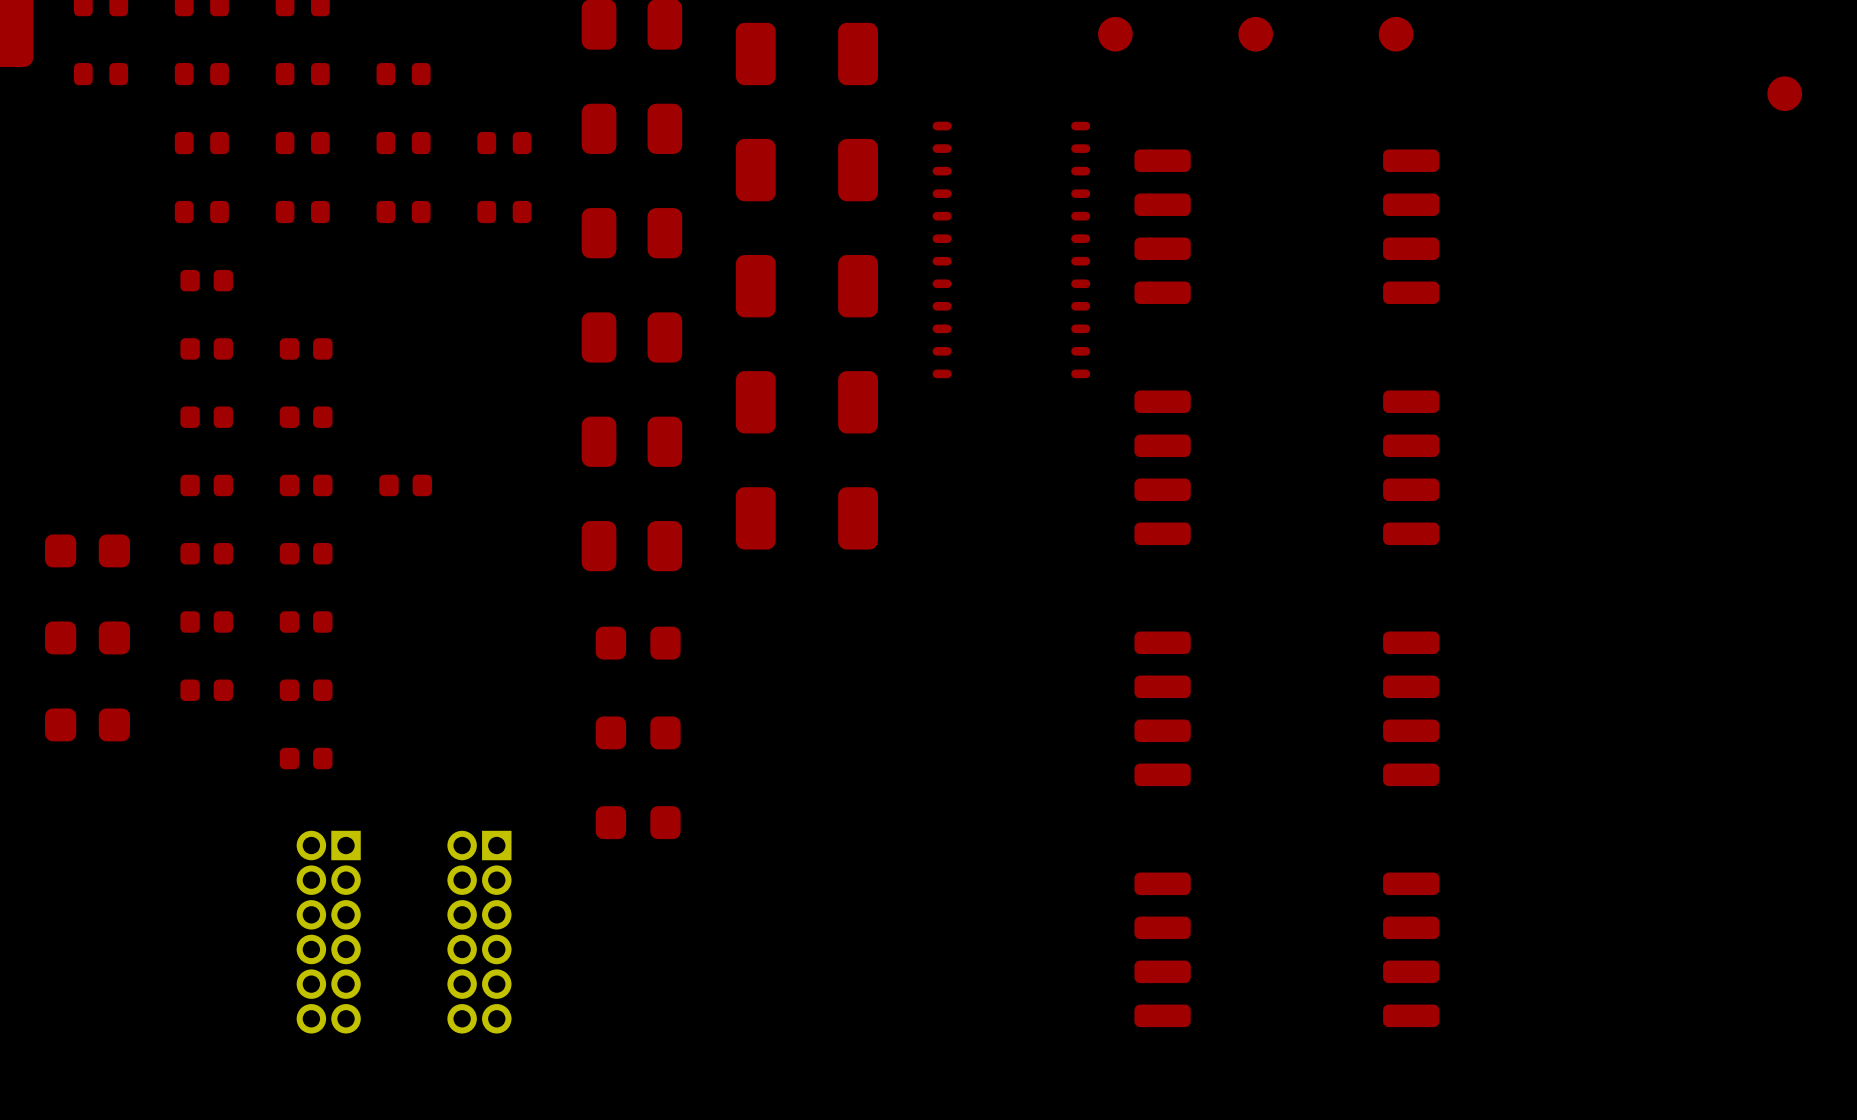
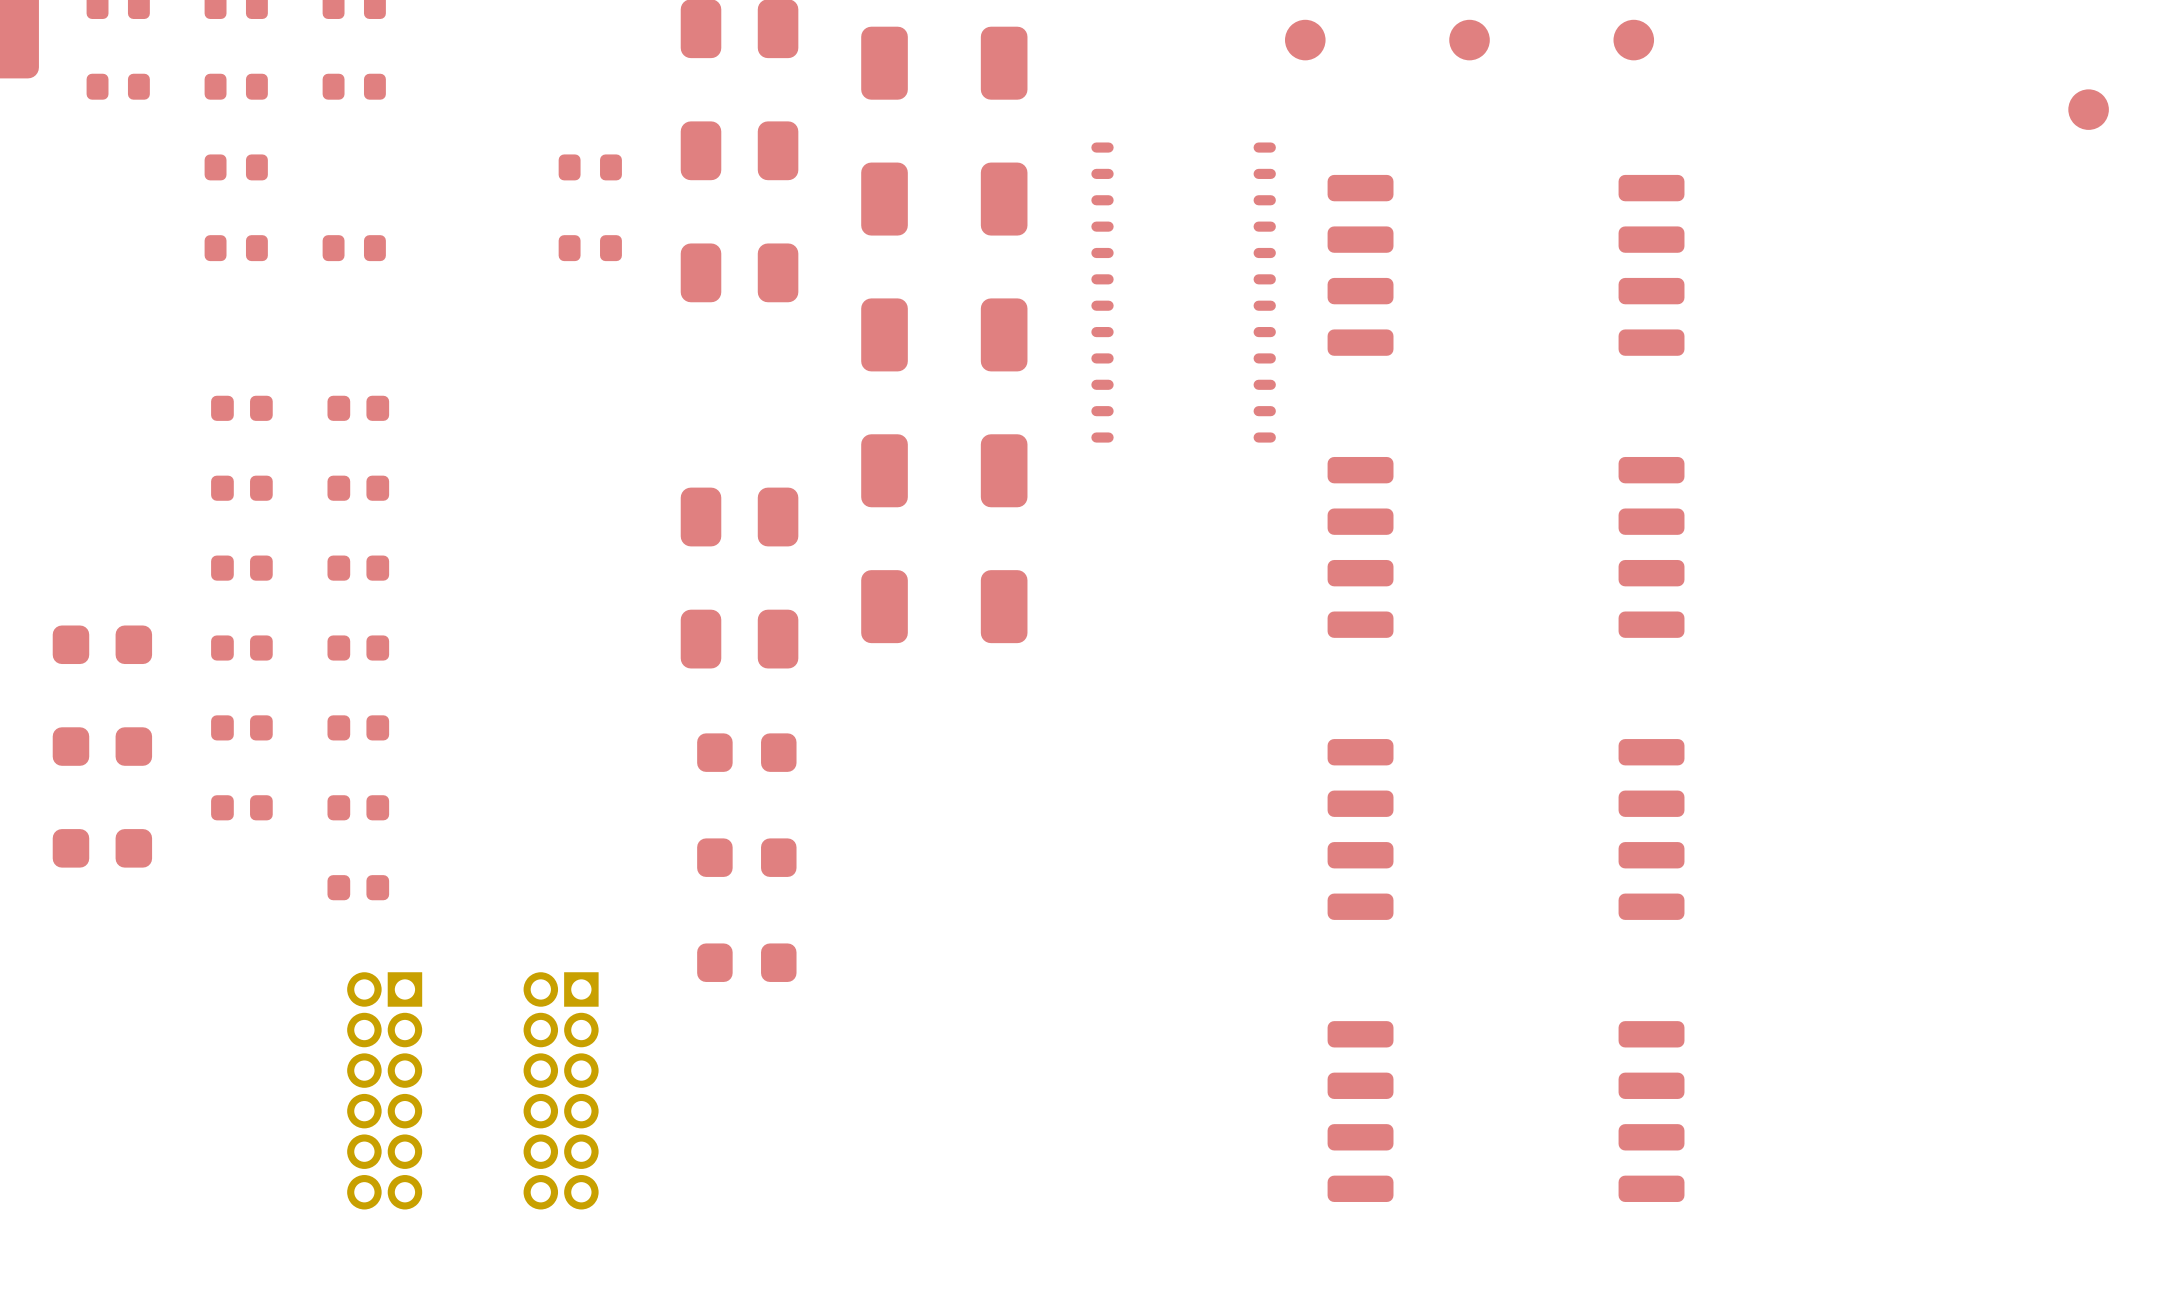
part: (403, 74) -> none
part: (302, 143) -> none
part: (403, 143) -> none
part: (403, 212) -> none
part: (206, 280) -> none
part: (631, 337) -> none
part: (405, 485) -> none

